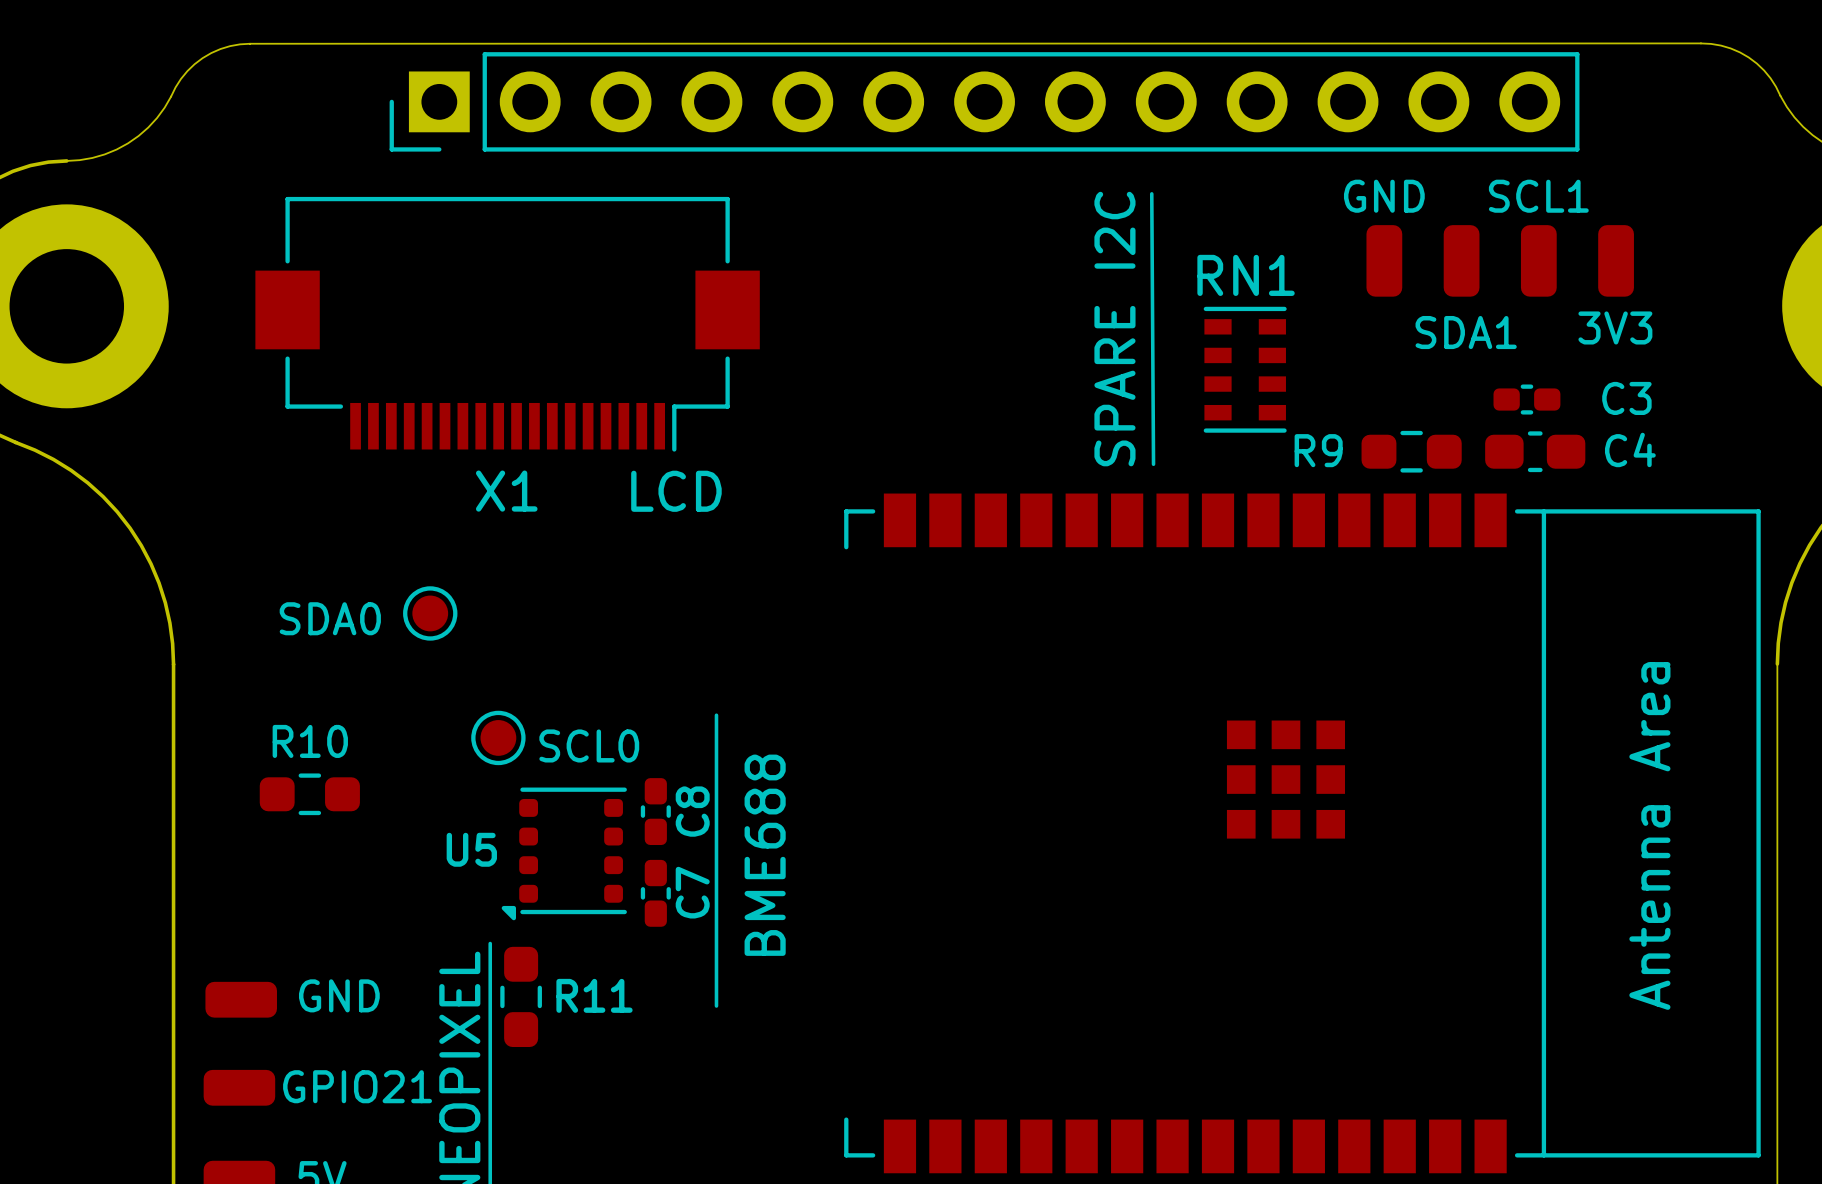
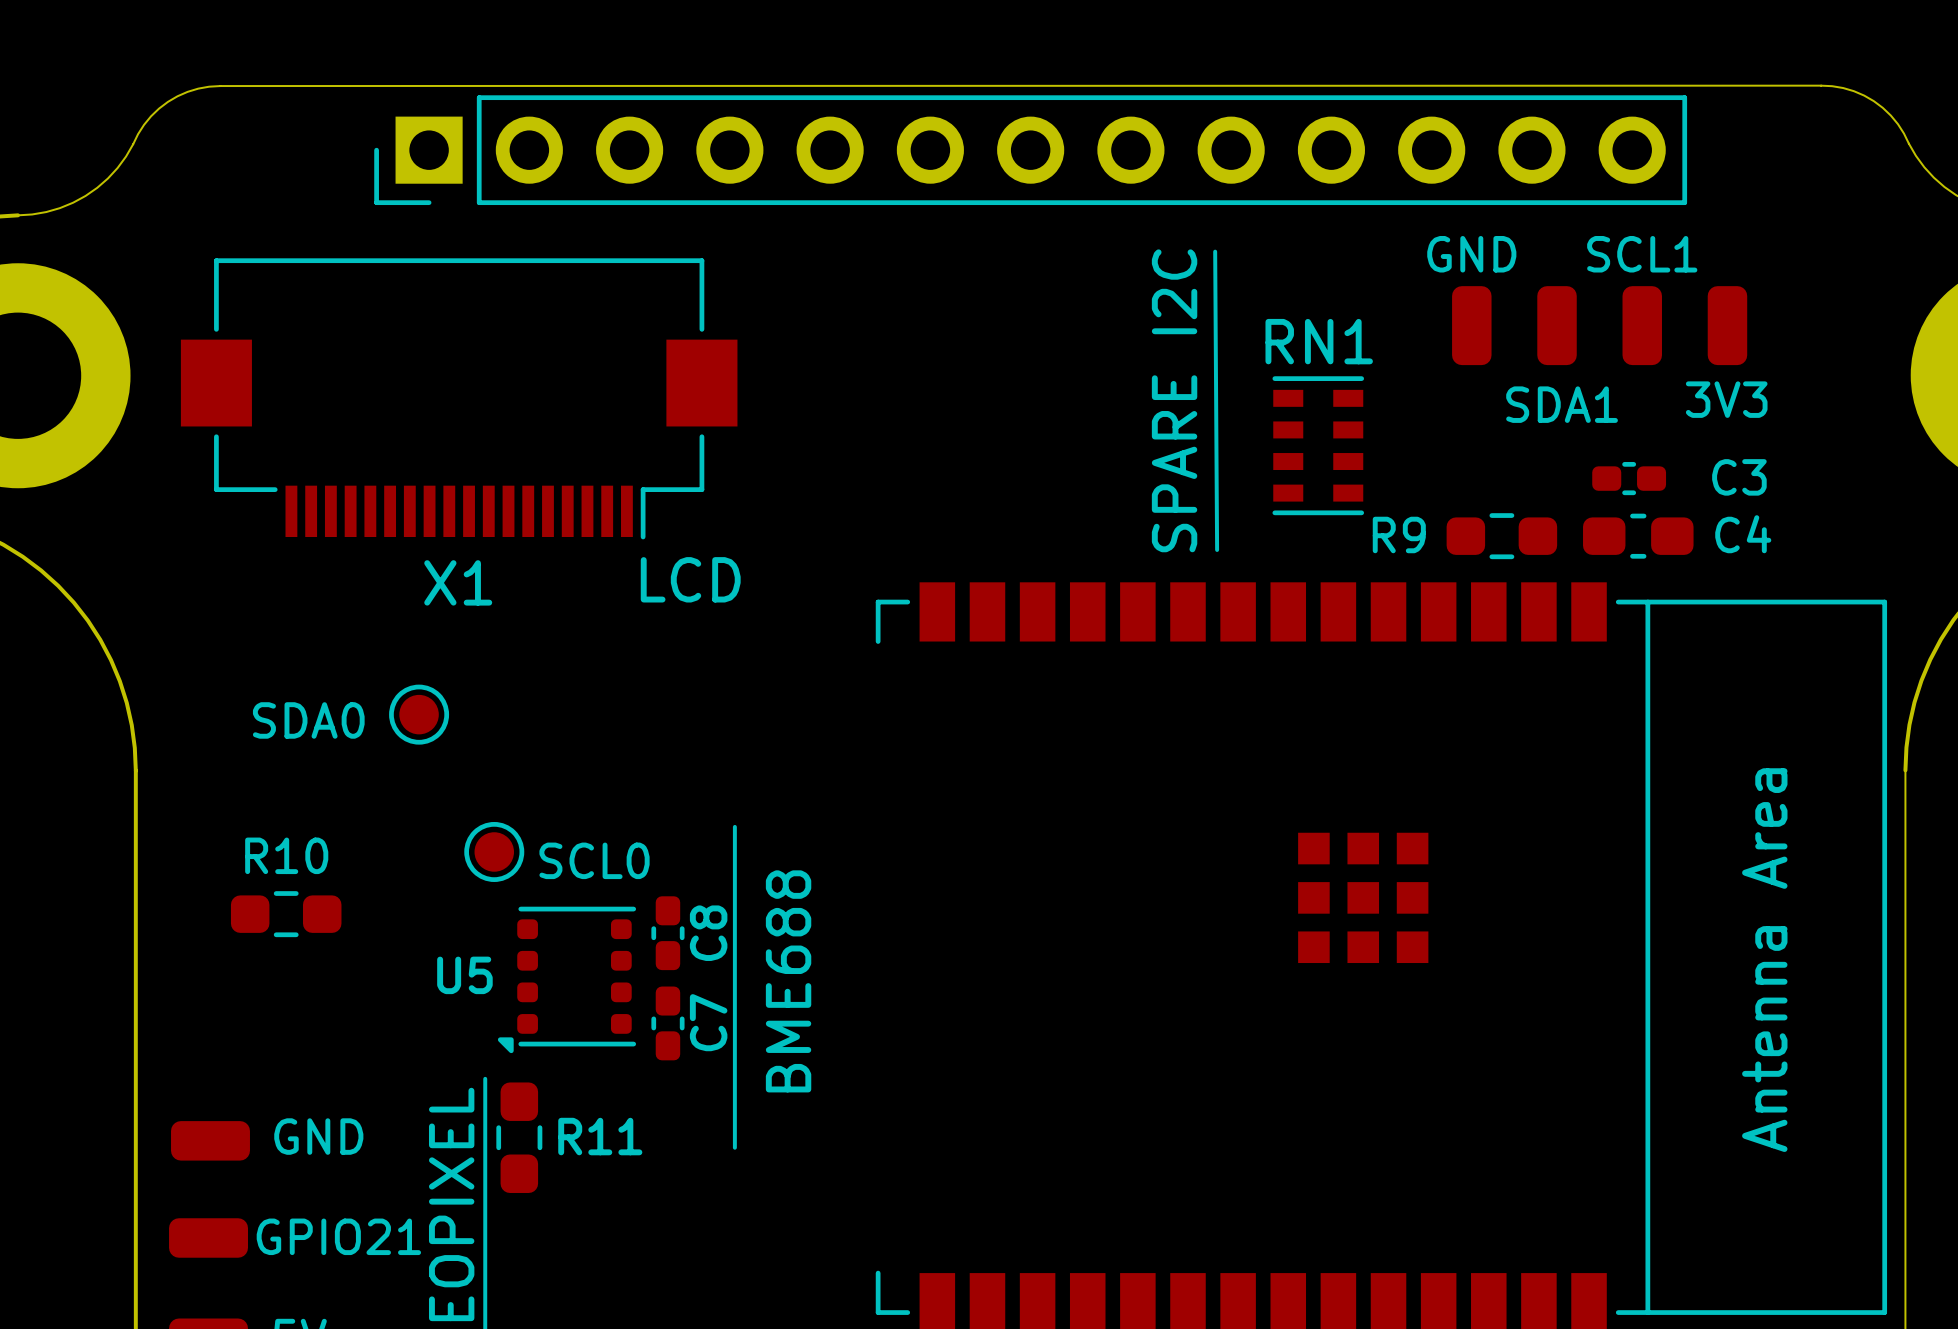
X1 position: (507, 324) -> (459, 398)

